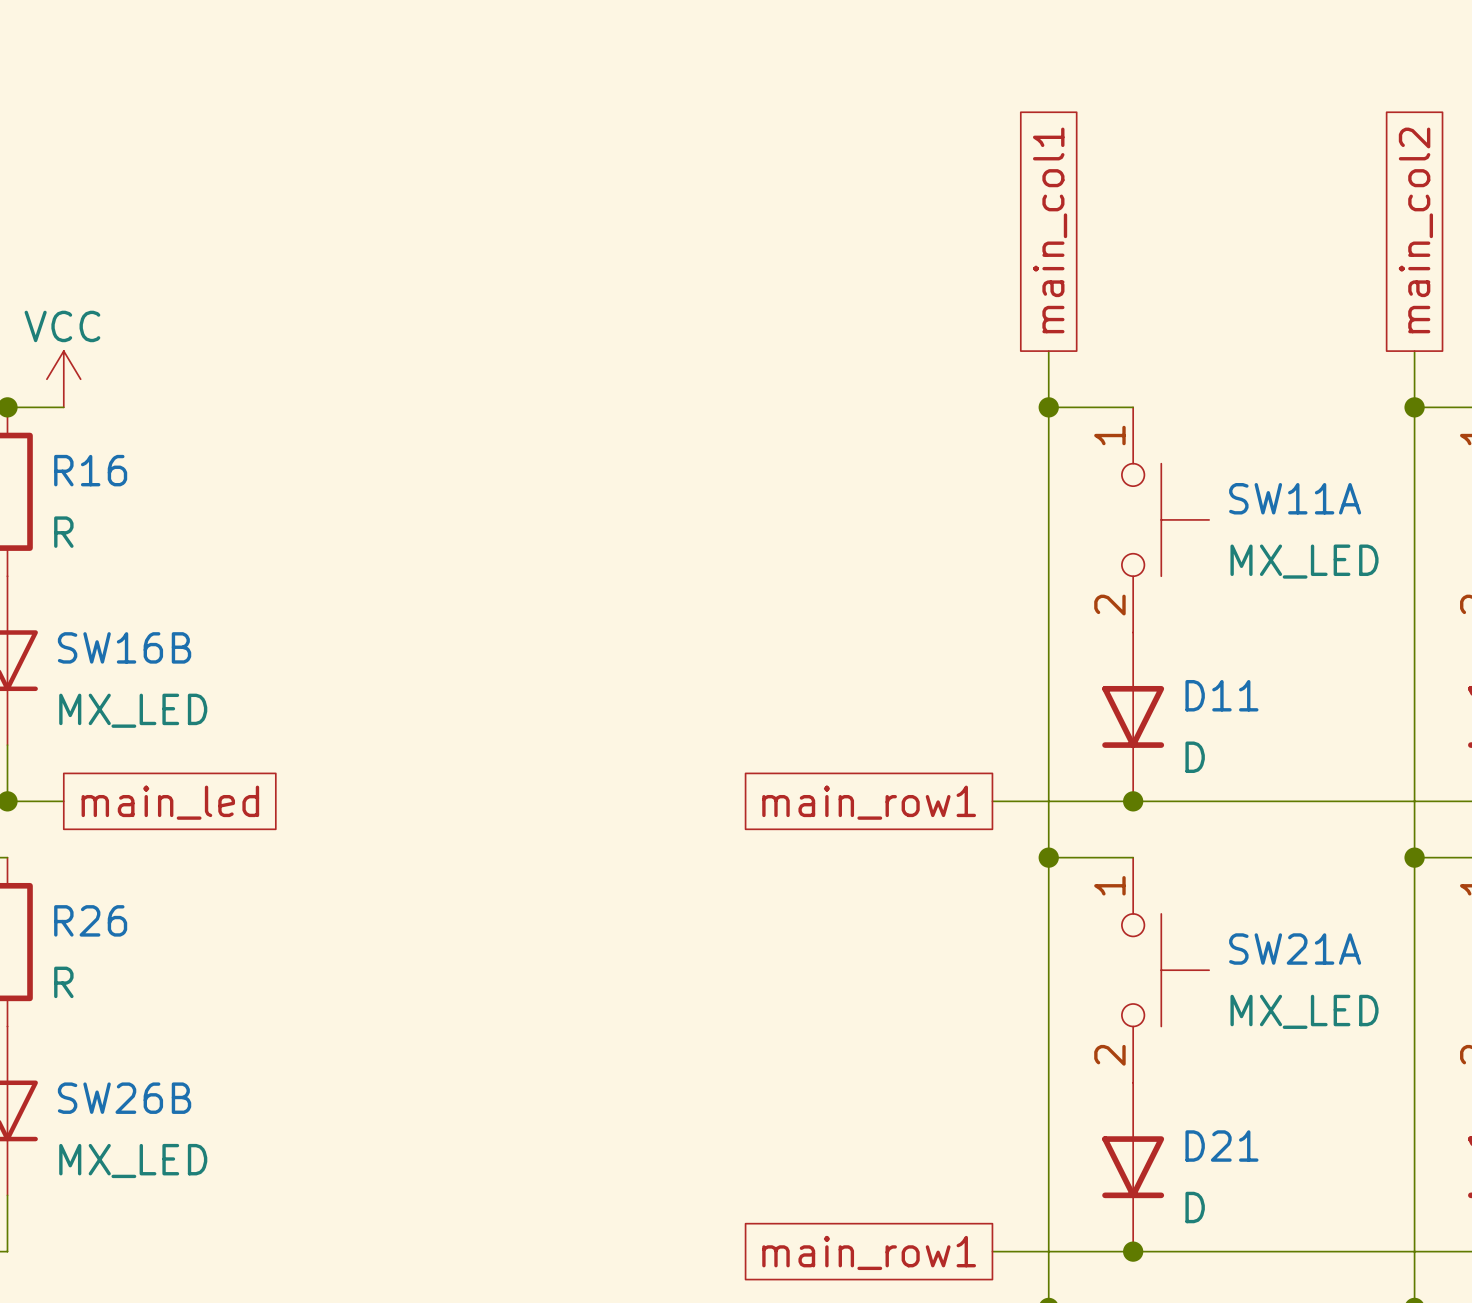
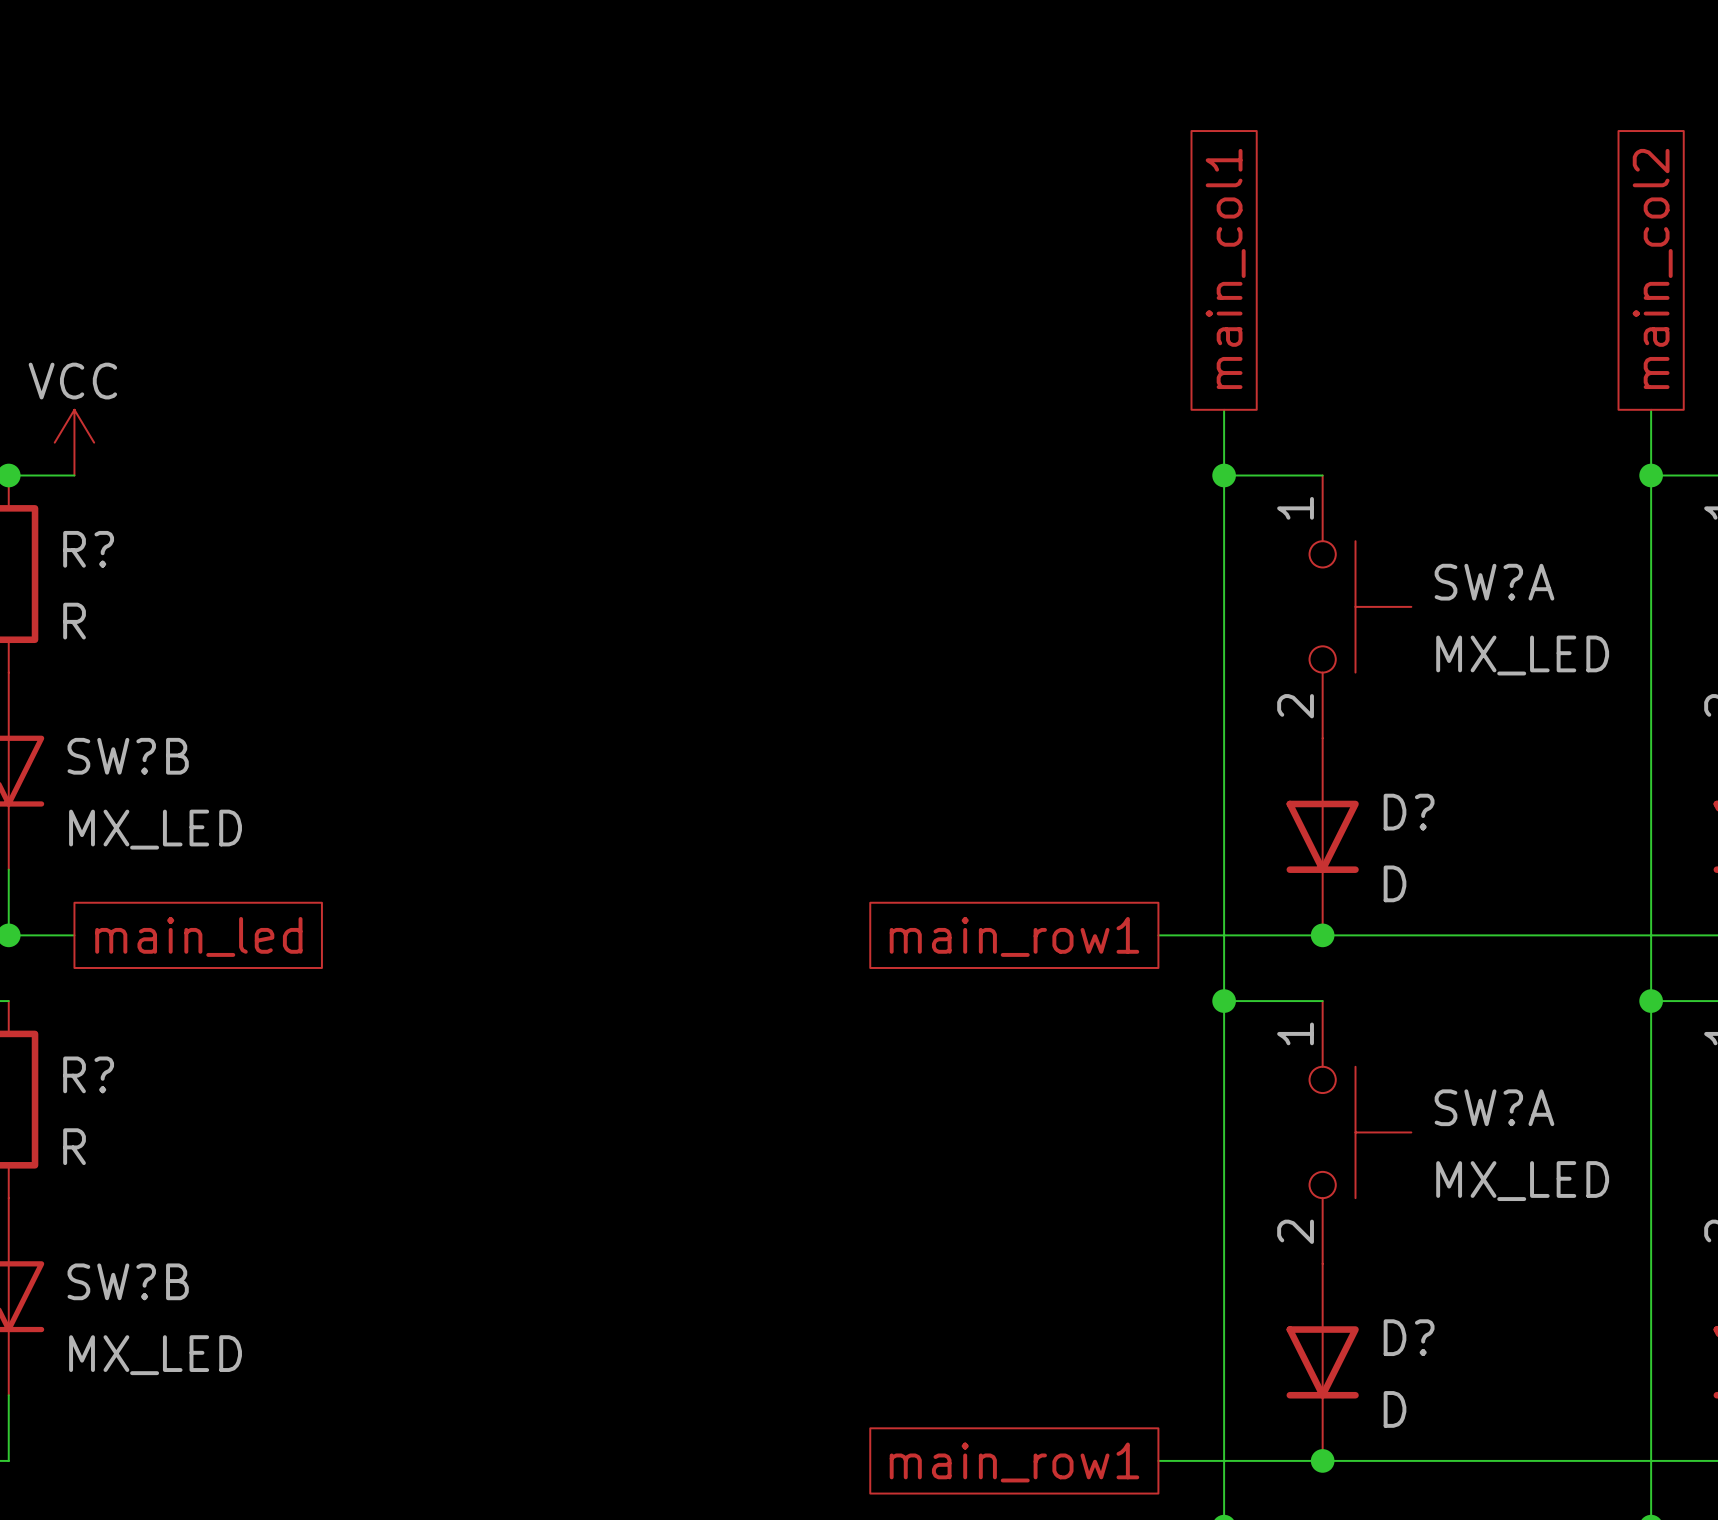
R16 name: R16 (90, 470) -> R? (88, 549)
SW11A name: SW11A (1295, 498) -> SW?A (1494, 582)
SW16B name: SW16B (124, 647) -> SW?B (128, 756)
D11 name: D11 (1221, 695) -> D? (1409, 812)
R26 name: R26 (90, 920) -> R? (88, 1074)
SW21A name: SW21A (1295, 949) -> SW?A (1494, 1107)
SW26B name: SW26B (124, 1098) -> SW?B (128, 1281)
D21 name: D21 (1221, 1146) -> D? (1409, 1337)

